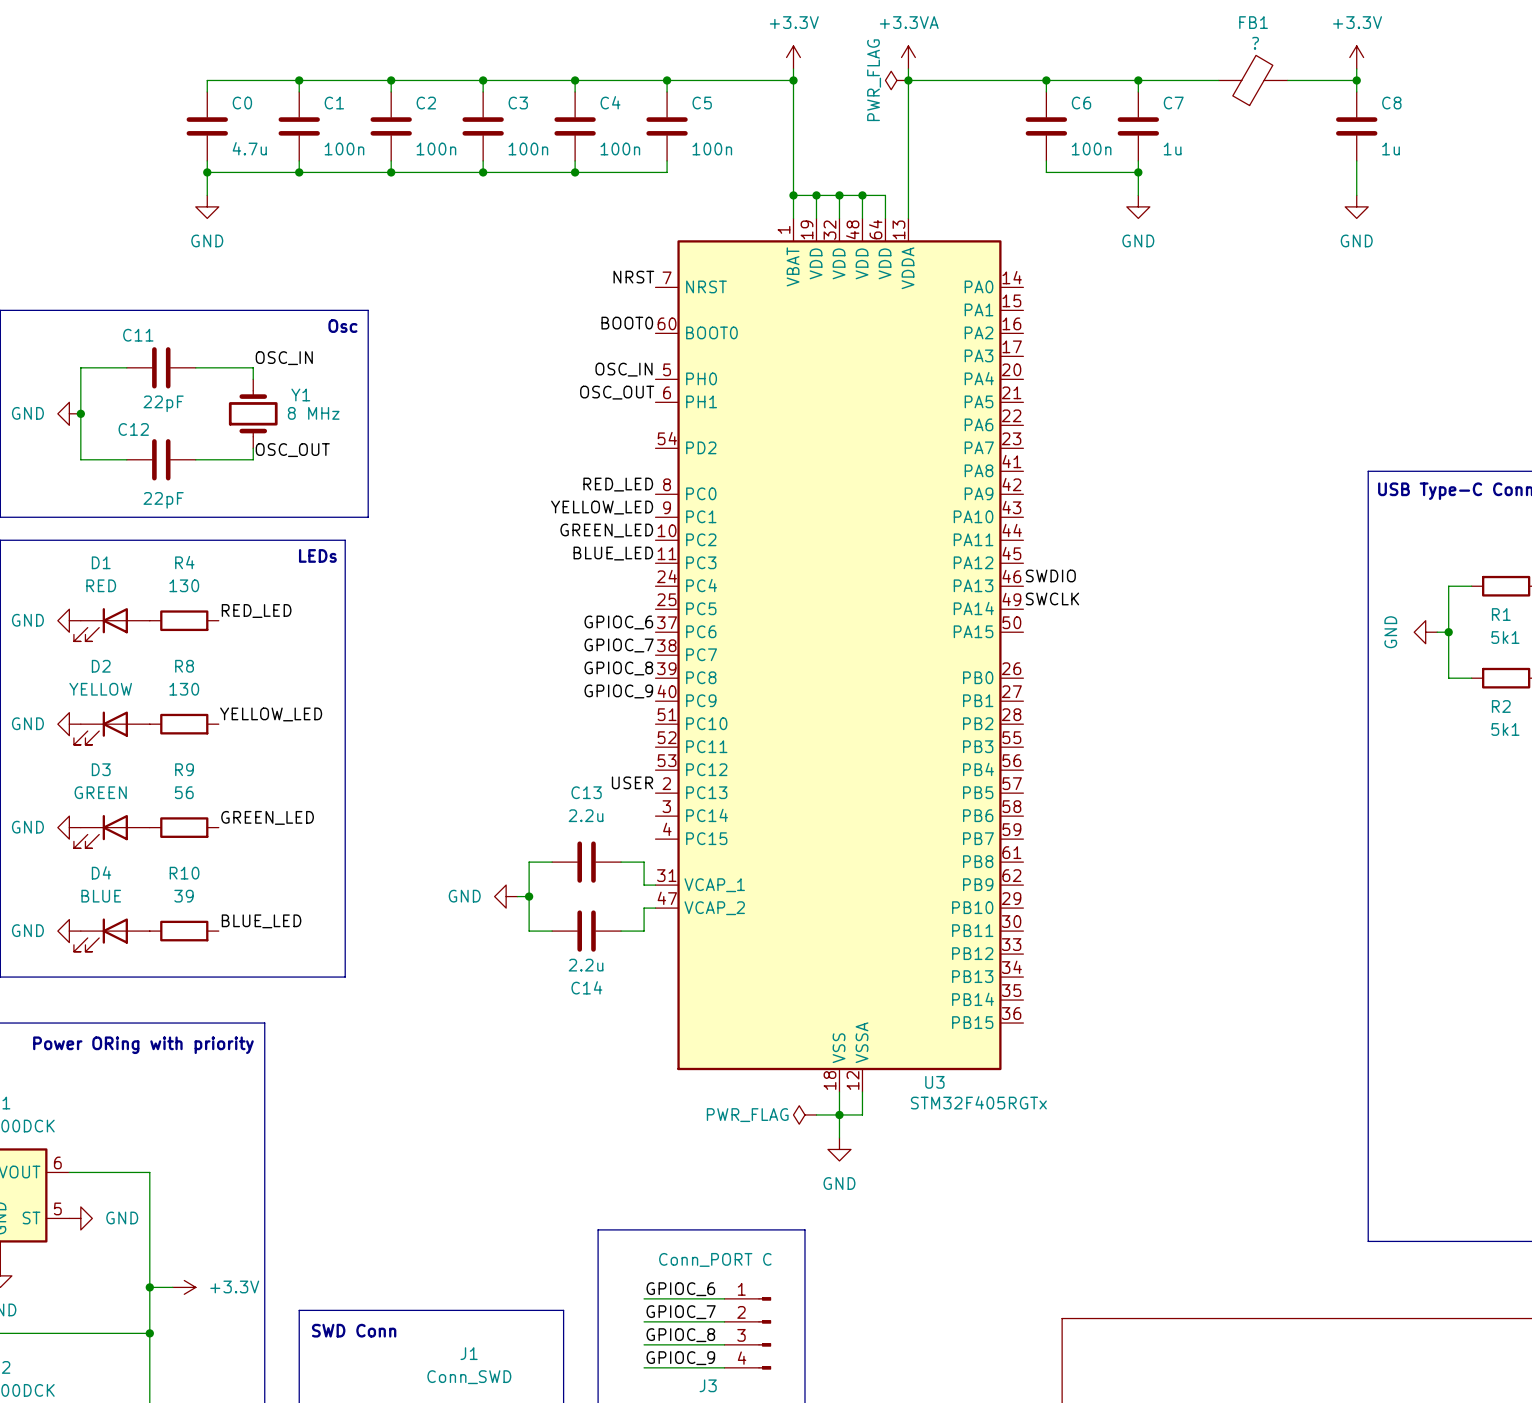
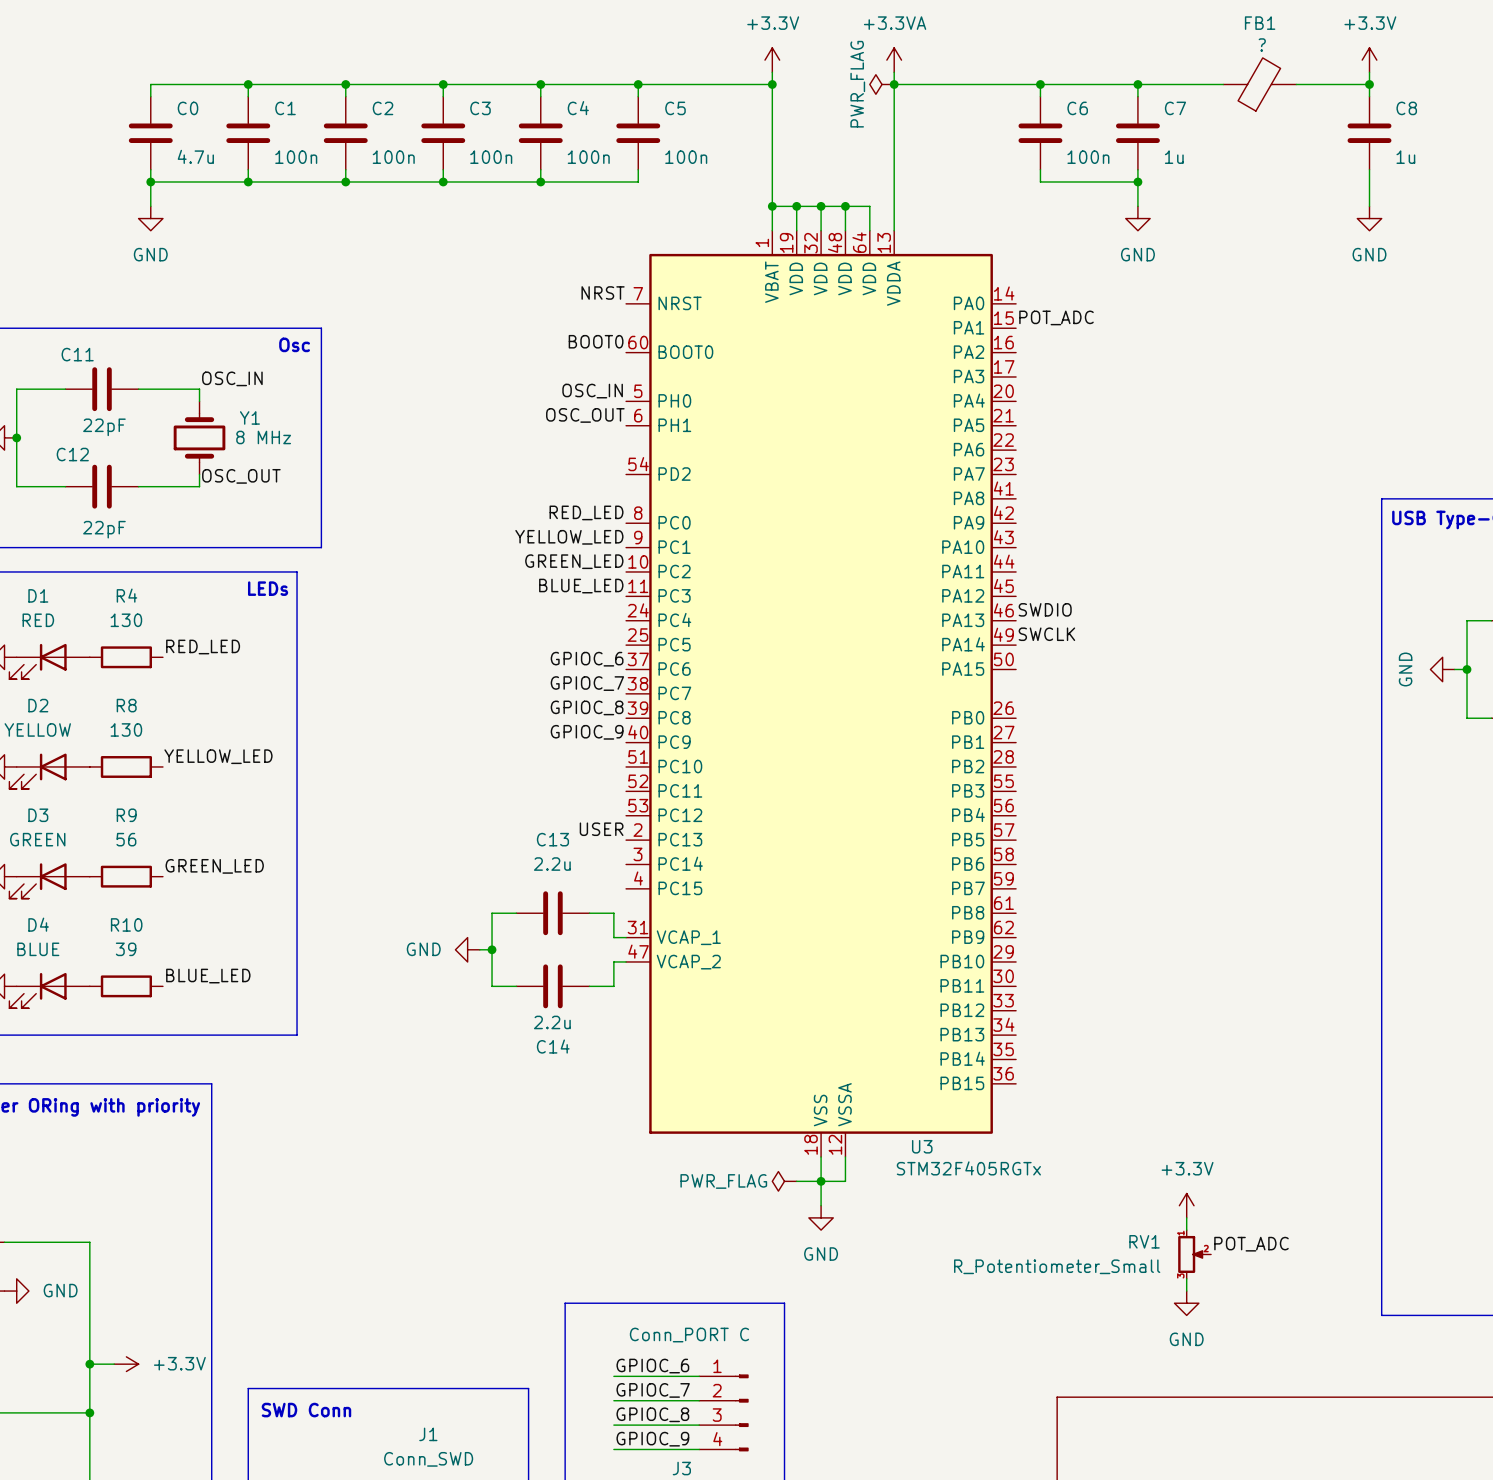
label: none -> POT_ADC (1056, 317)
power symbol: none -> +3.3V (1186, 1205)
wire: none -> (1186, 1217) (1186, 1230)
label: none -> POT_ADC (1251, 1244)
RV1: none -> R_Potentiometer_Small (1194, 1254)
wire: none -> (1186, 1278) (1186, 1291)
power symbol: none -> GND (1186, 1303)

